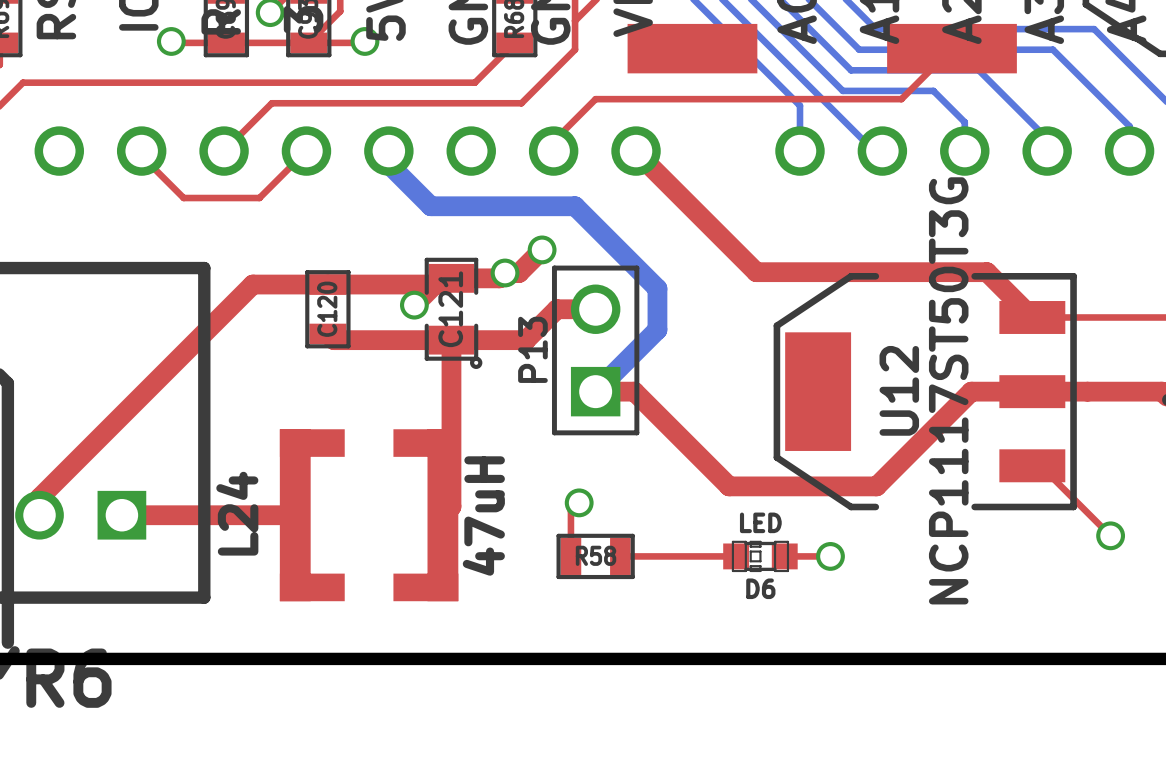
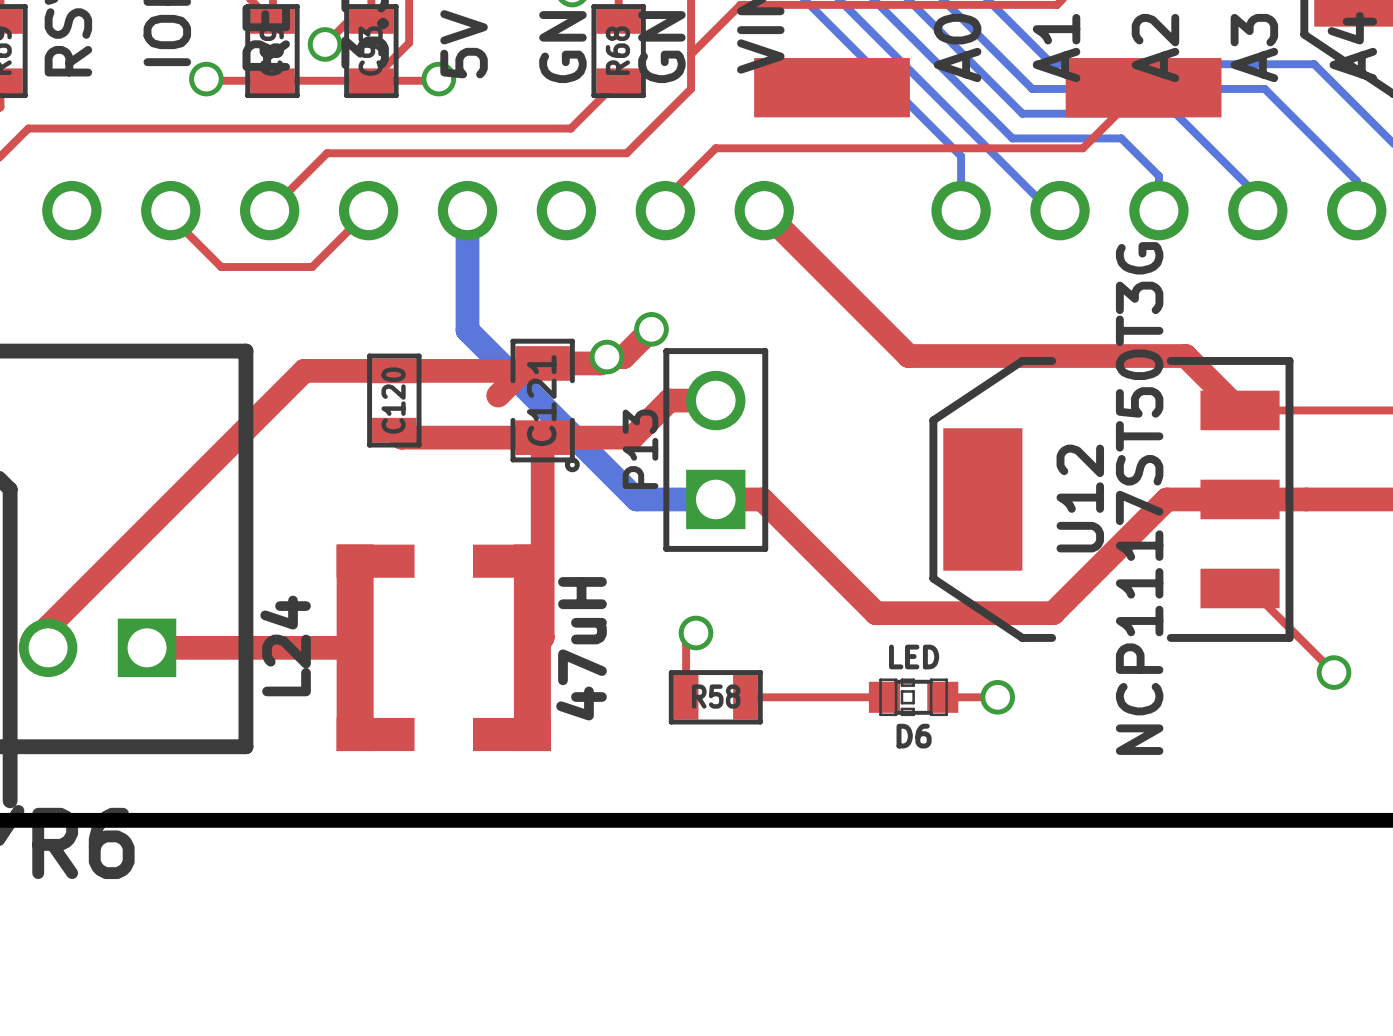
bottom track: (388, 164) (430, 206) (575, 206) (657, 288) (657, 329) (595, 391) -> (467, 226) (467, 330) (636, 499) (715, 499)
via: (414, 305) -> none

